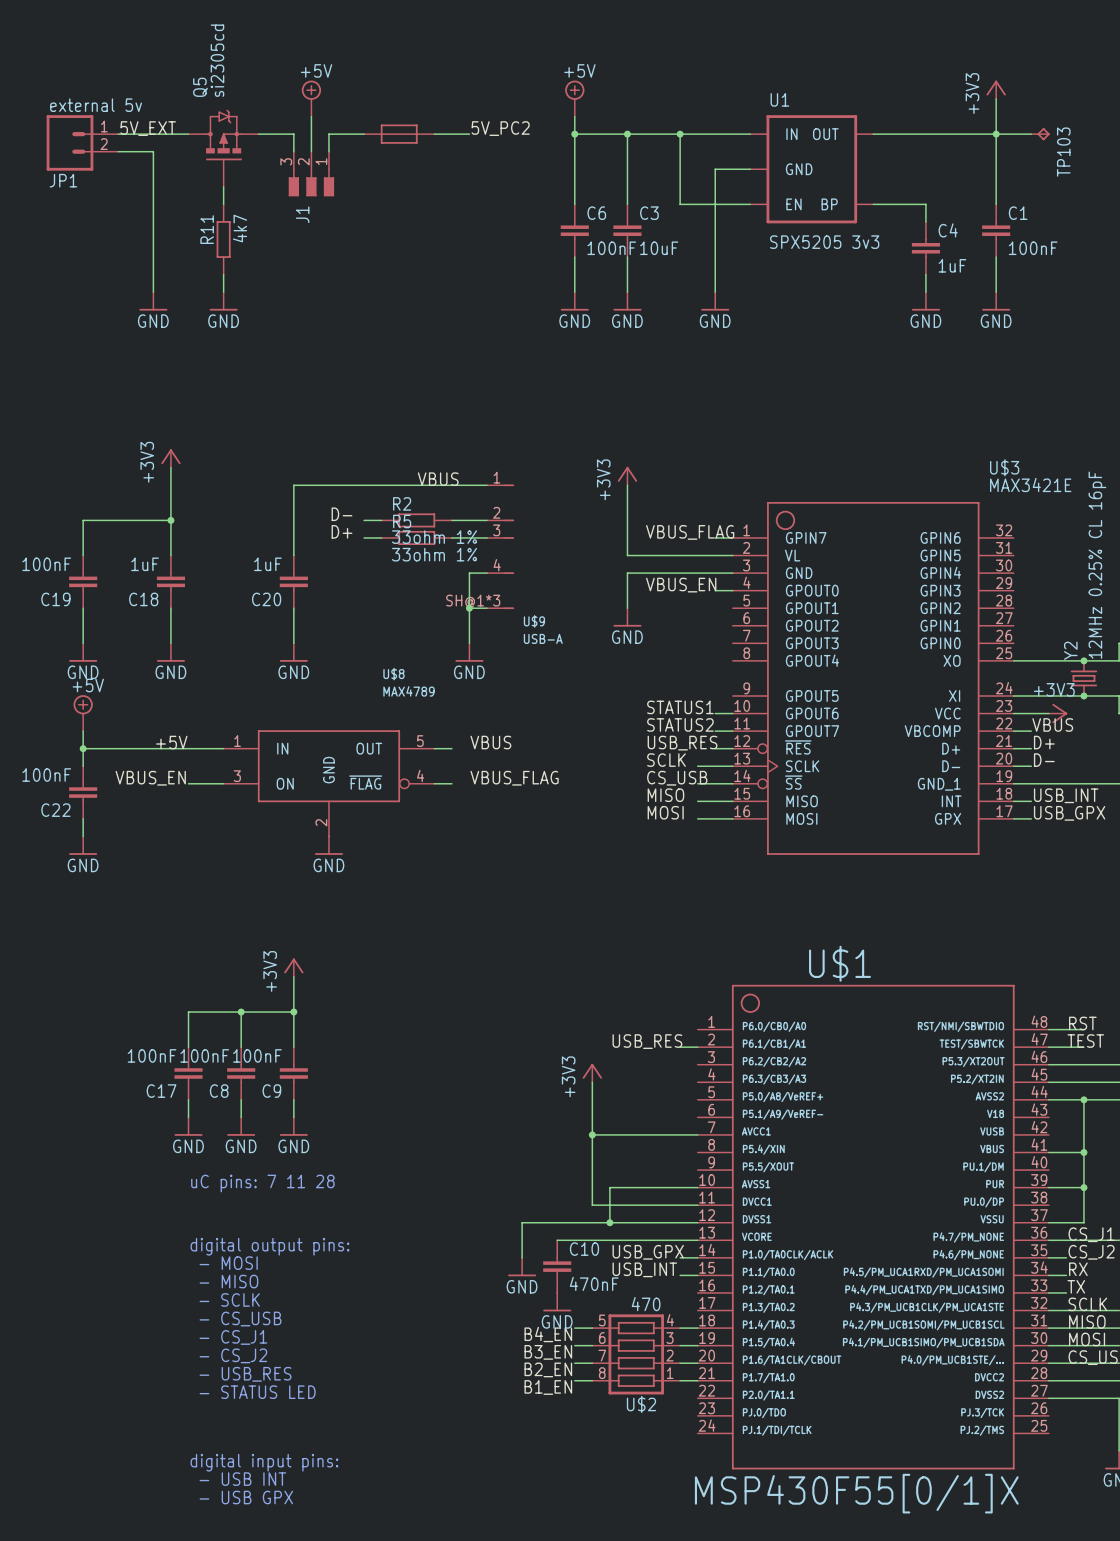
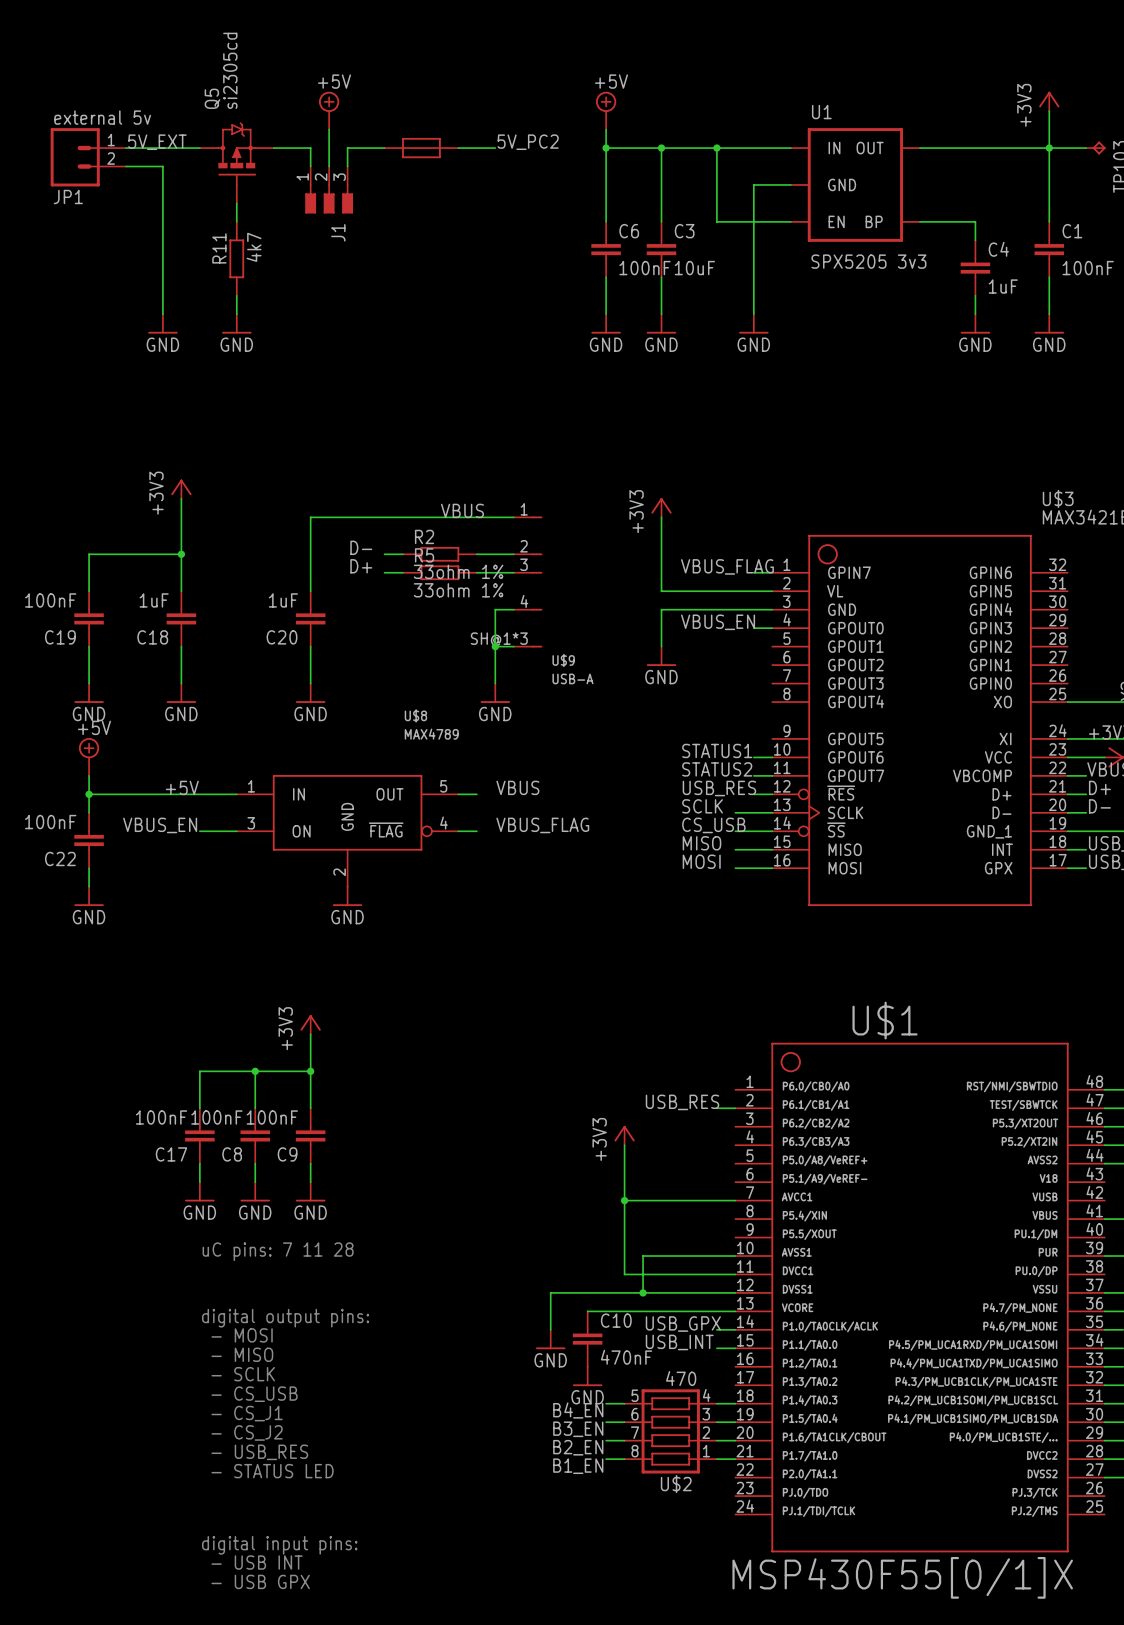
J1 flip: as is (311, 182) -> left-right (329, 198)

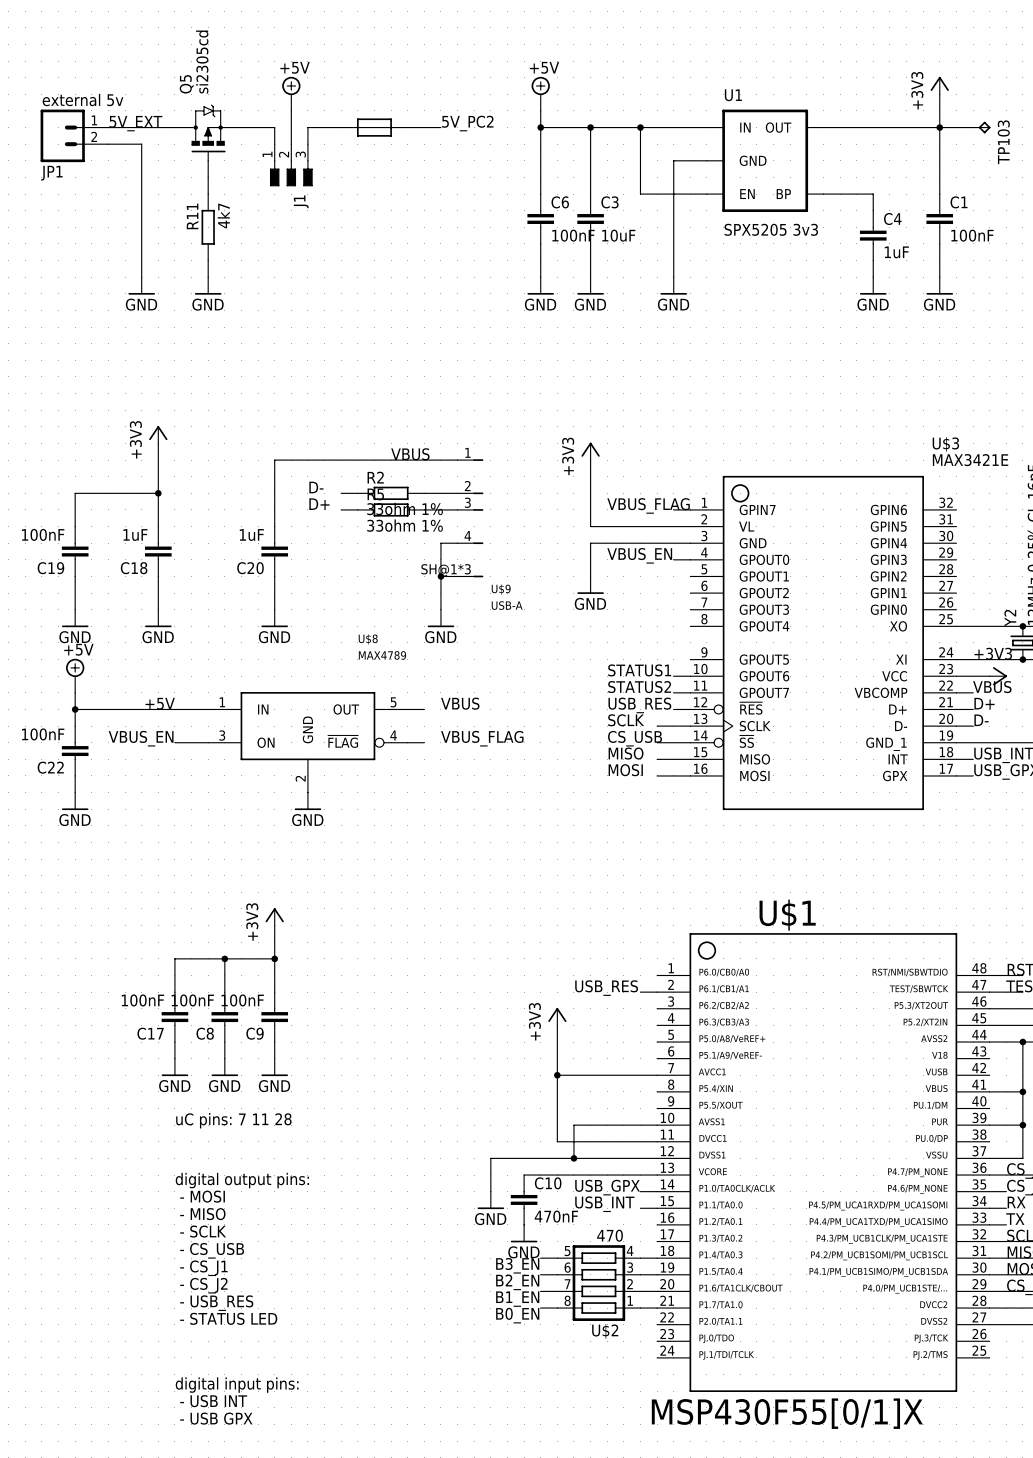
label: B4_EN (578, 1410) -> B3_EN (517, 1265)
label: B3_EN (578, 1429) -> B2_EN (517, 1282)
label: B2_EN (578, 1447) -> B1_EN (517, 1299)
label: B1_EN (578, 1466) -> B0_EN (517, 1315)

